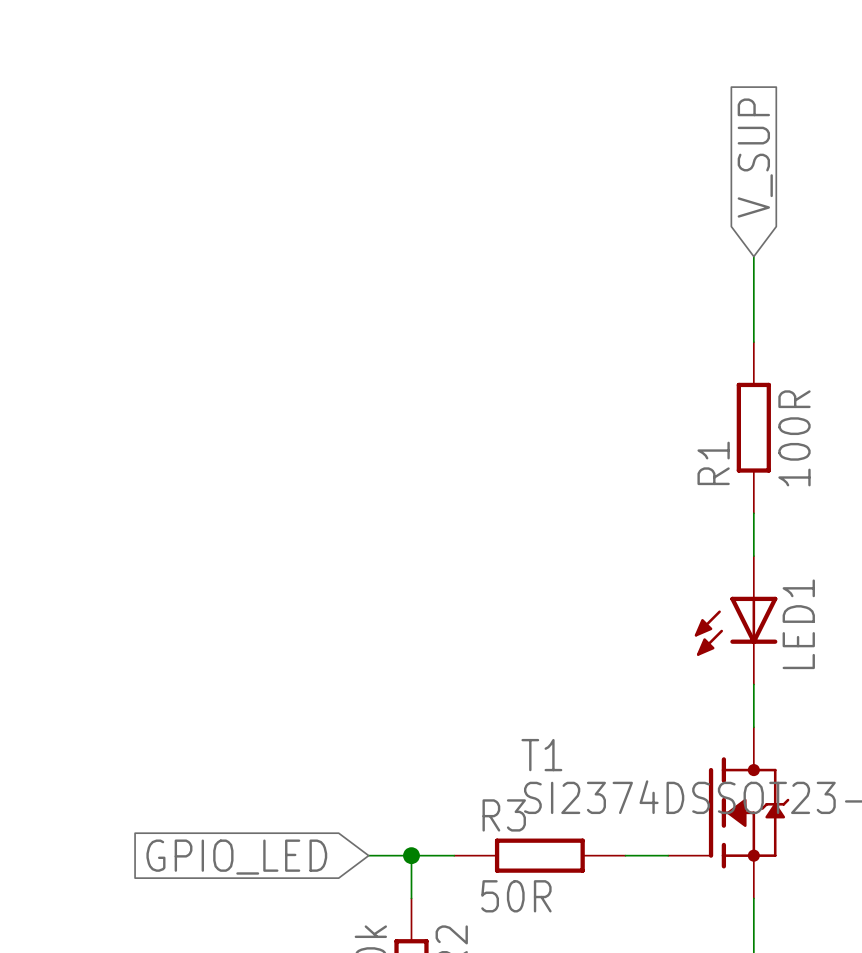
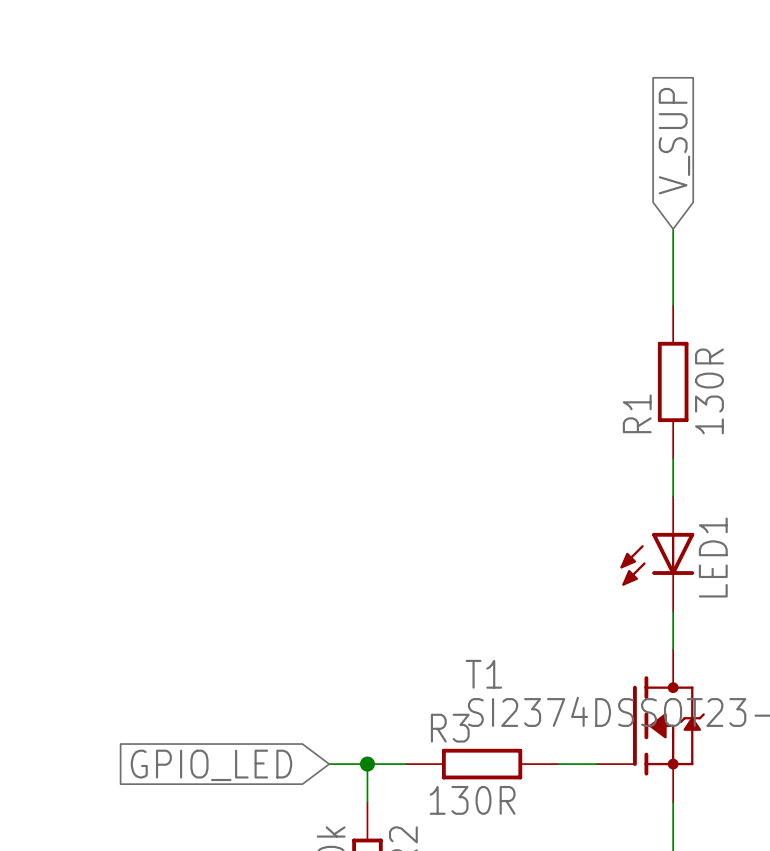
R1 value: 100R (794, 438) -> 130R (709, 391)
R3 value: 50R (516, 896) -> 130R (472, 800)

